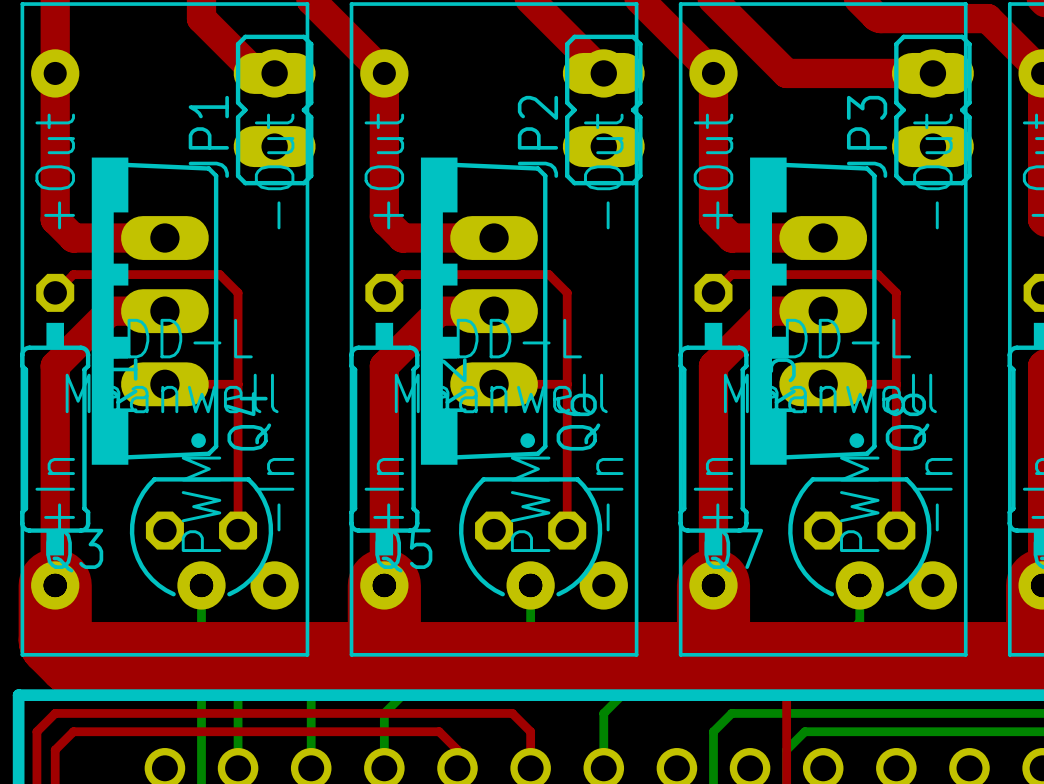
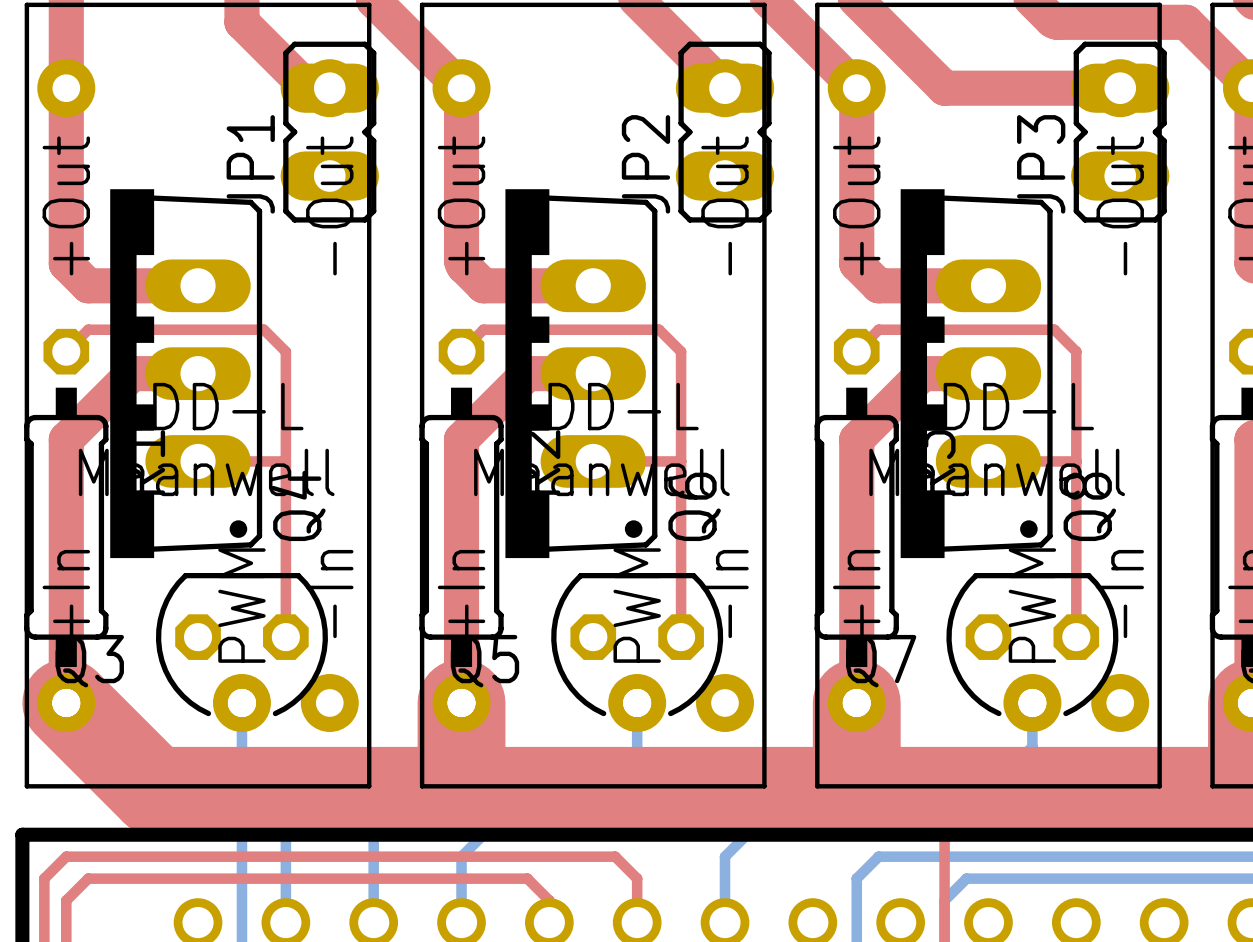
top track: (55, 585) (55, 640) (73, 658) (128, 658) -> (66, 702) (154, 790)

